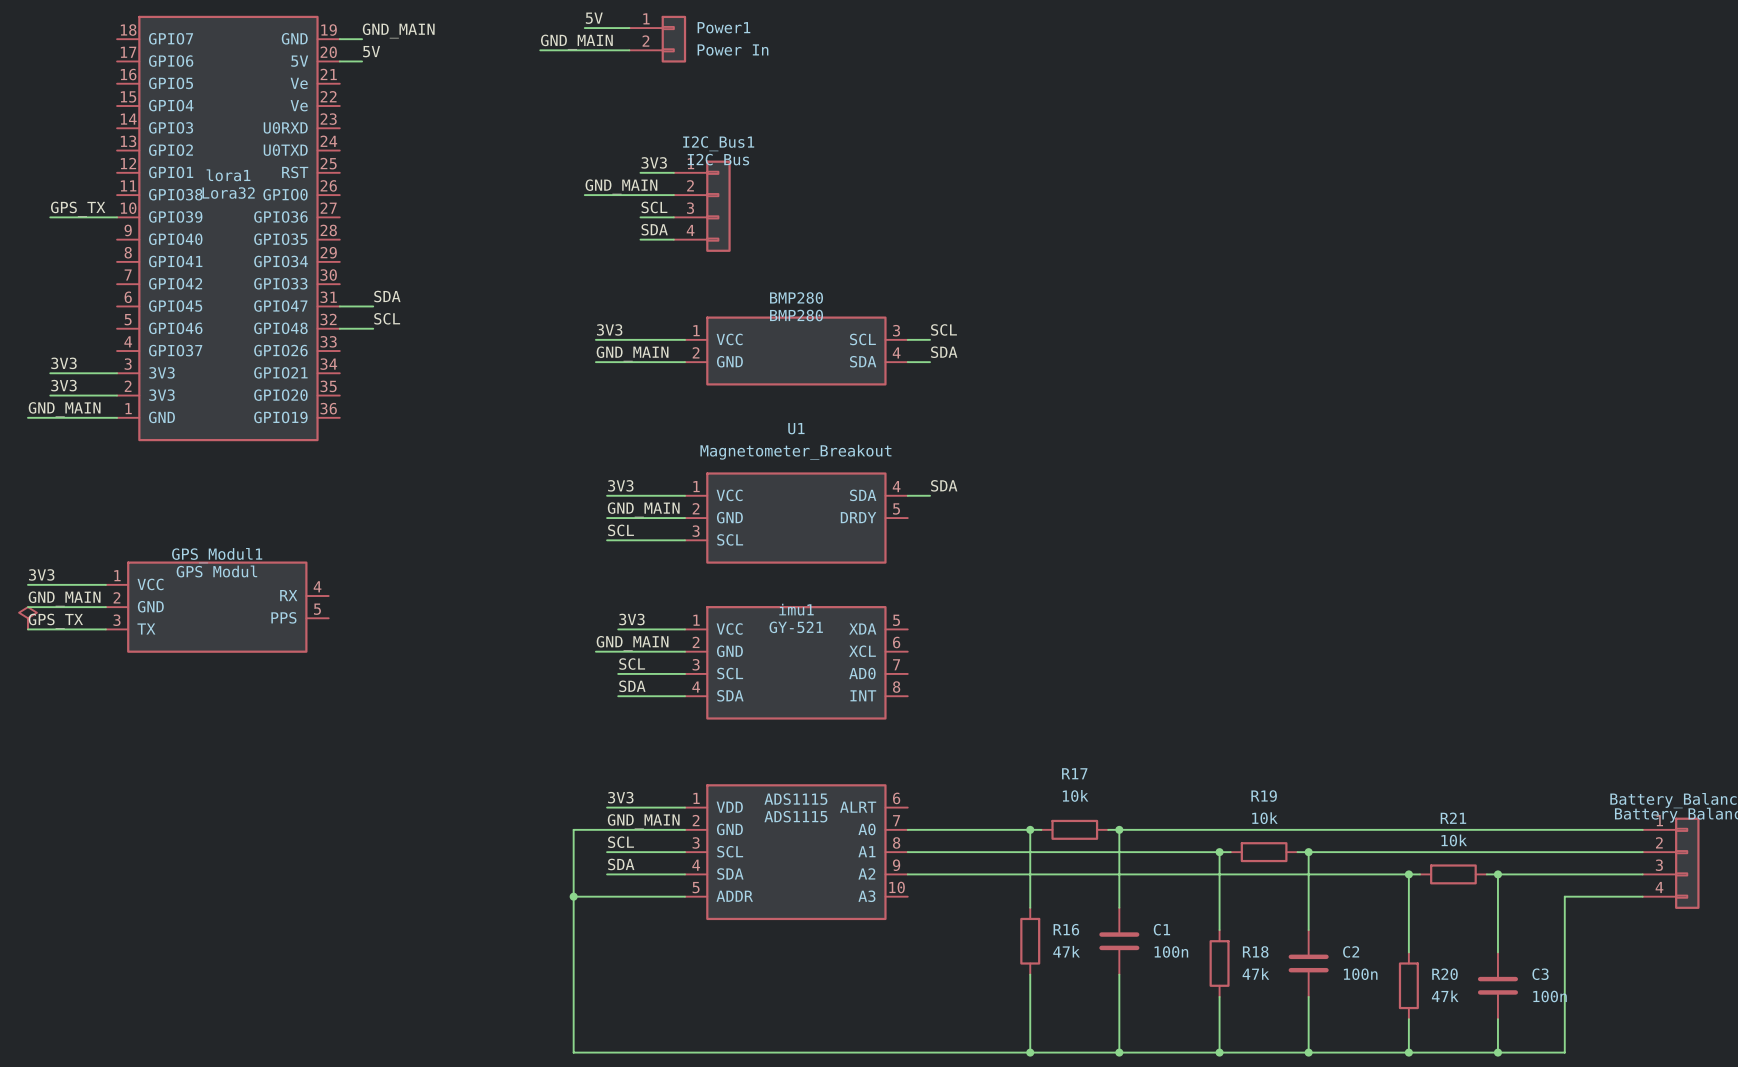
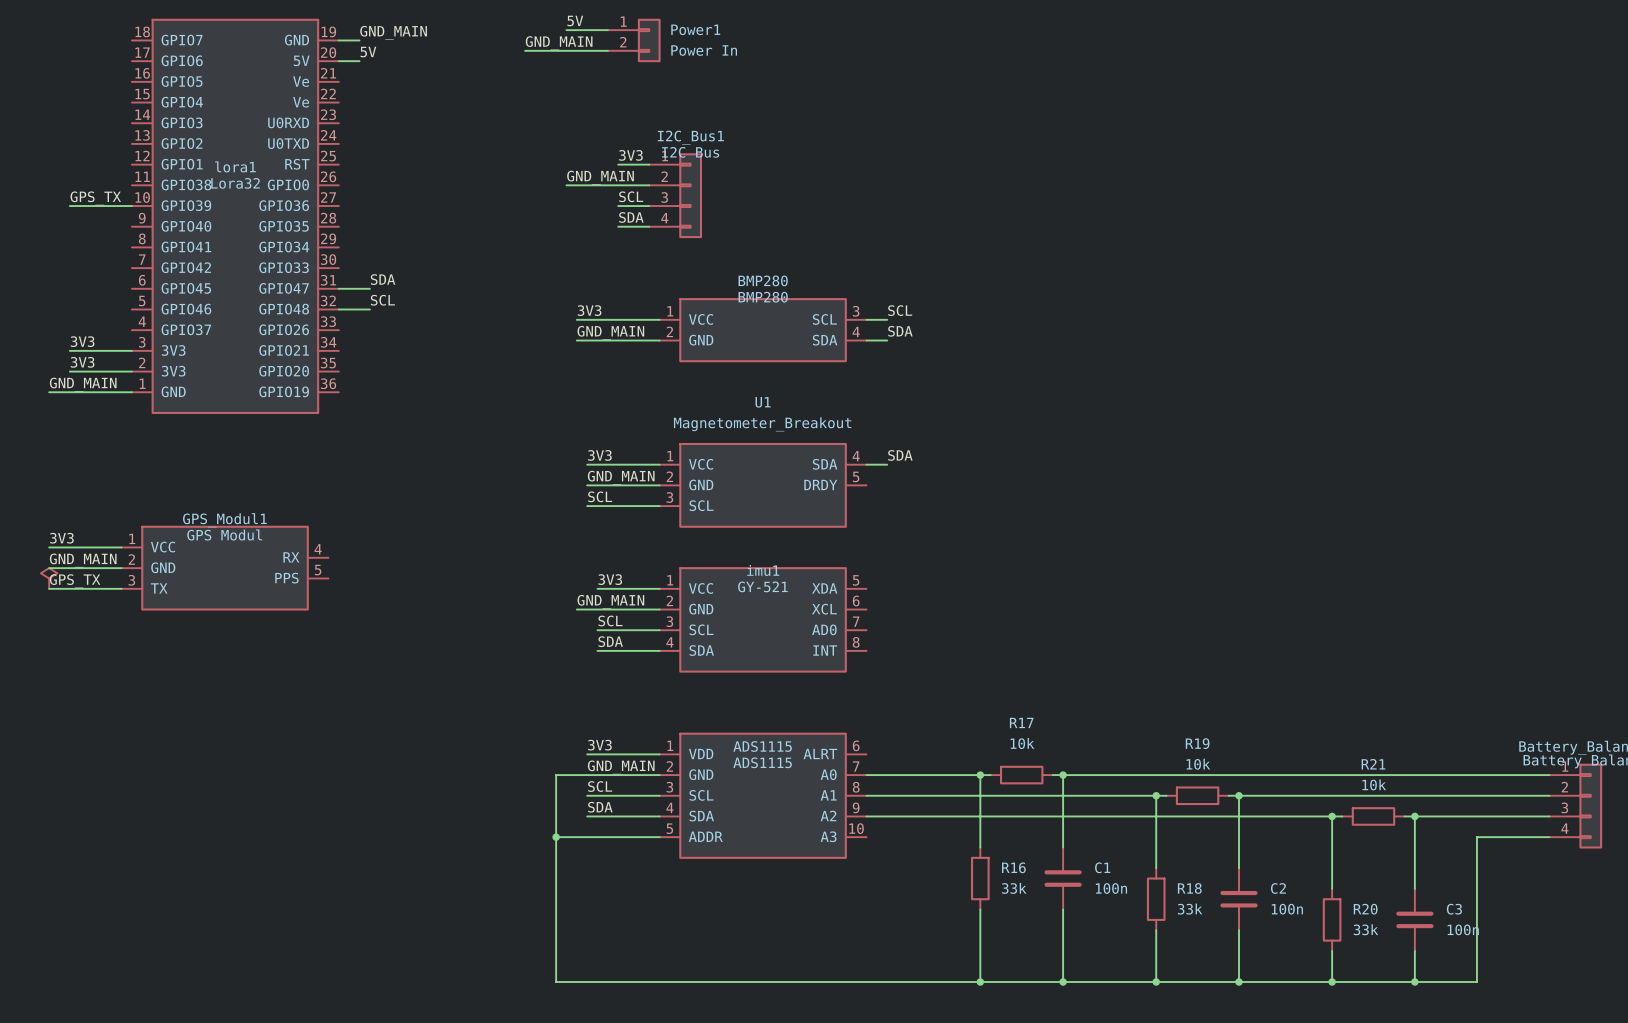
R16 value: 47k (1066, 951) -> 33k (1014, 888)
R18 value: 47k (1255, 973) -> 33k (1190, 909)
R20 value: 47k (1445, 996) -> 33k (1365, 929)

